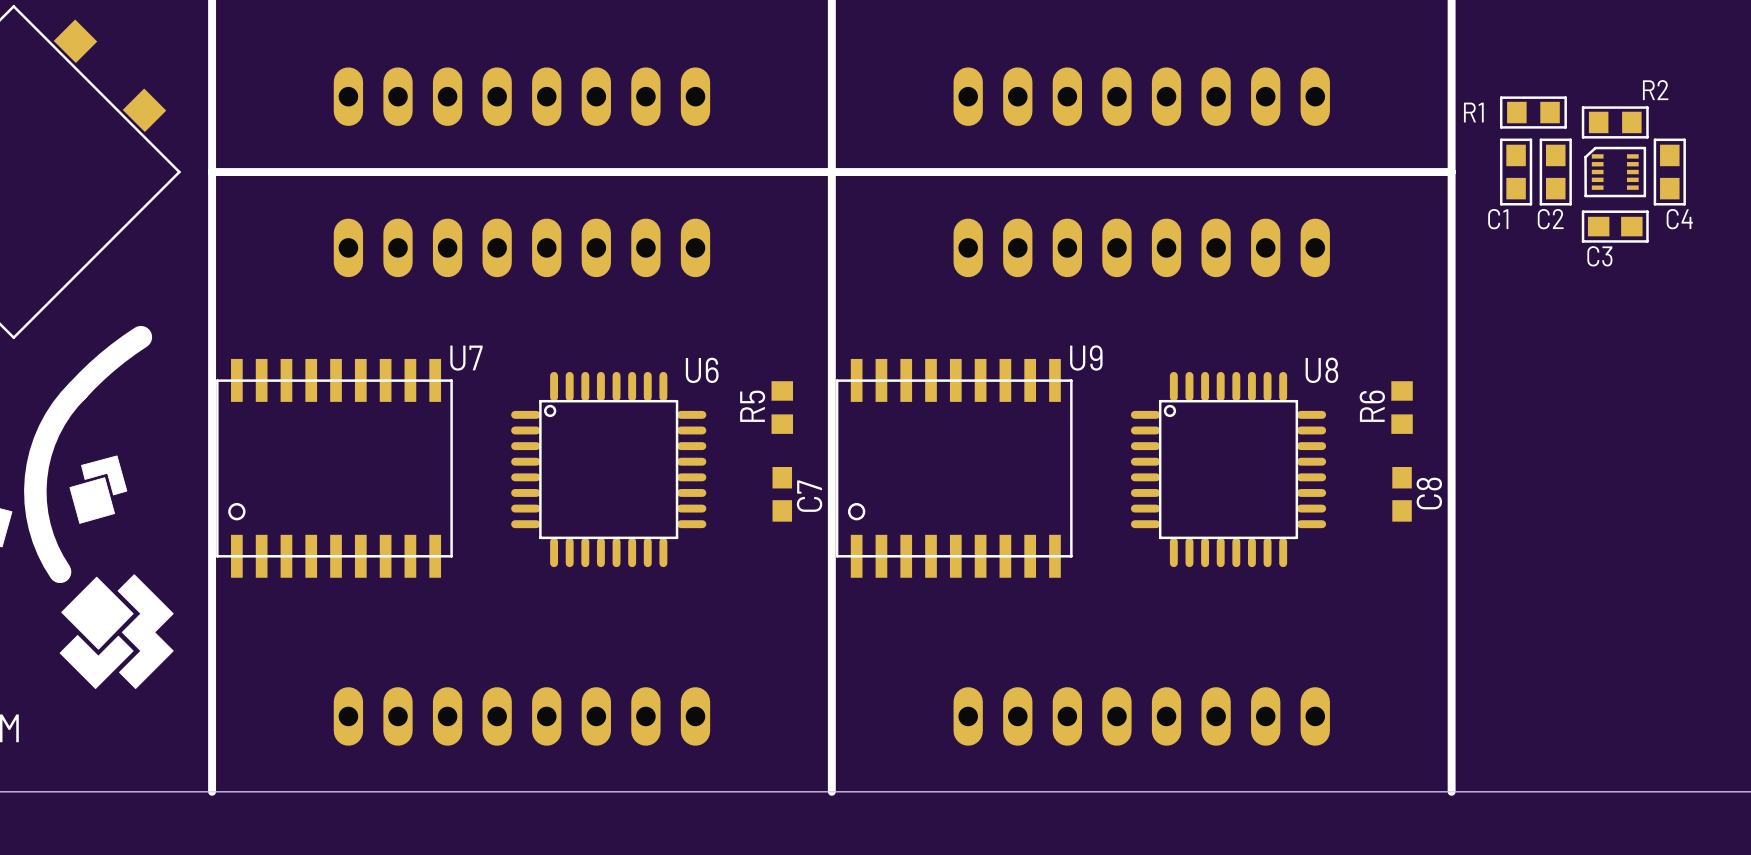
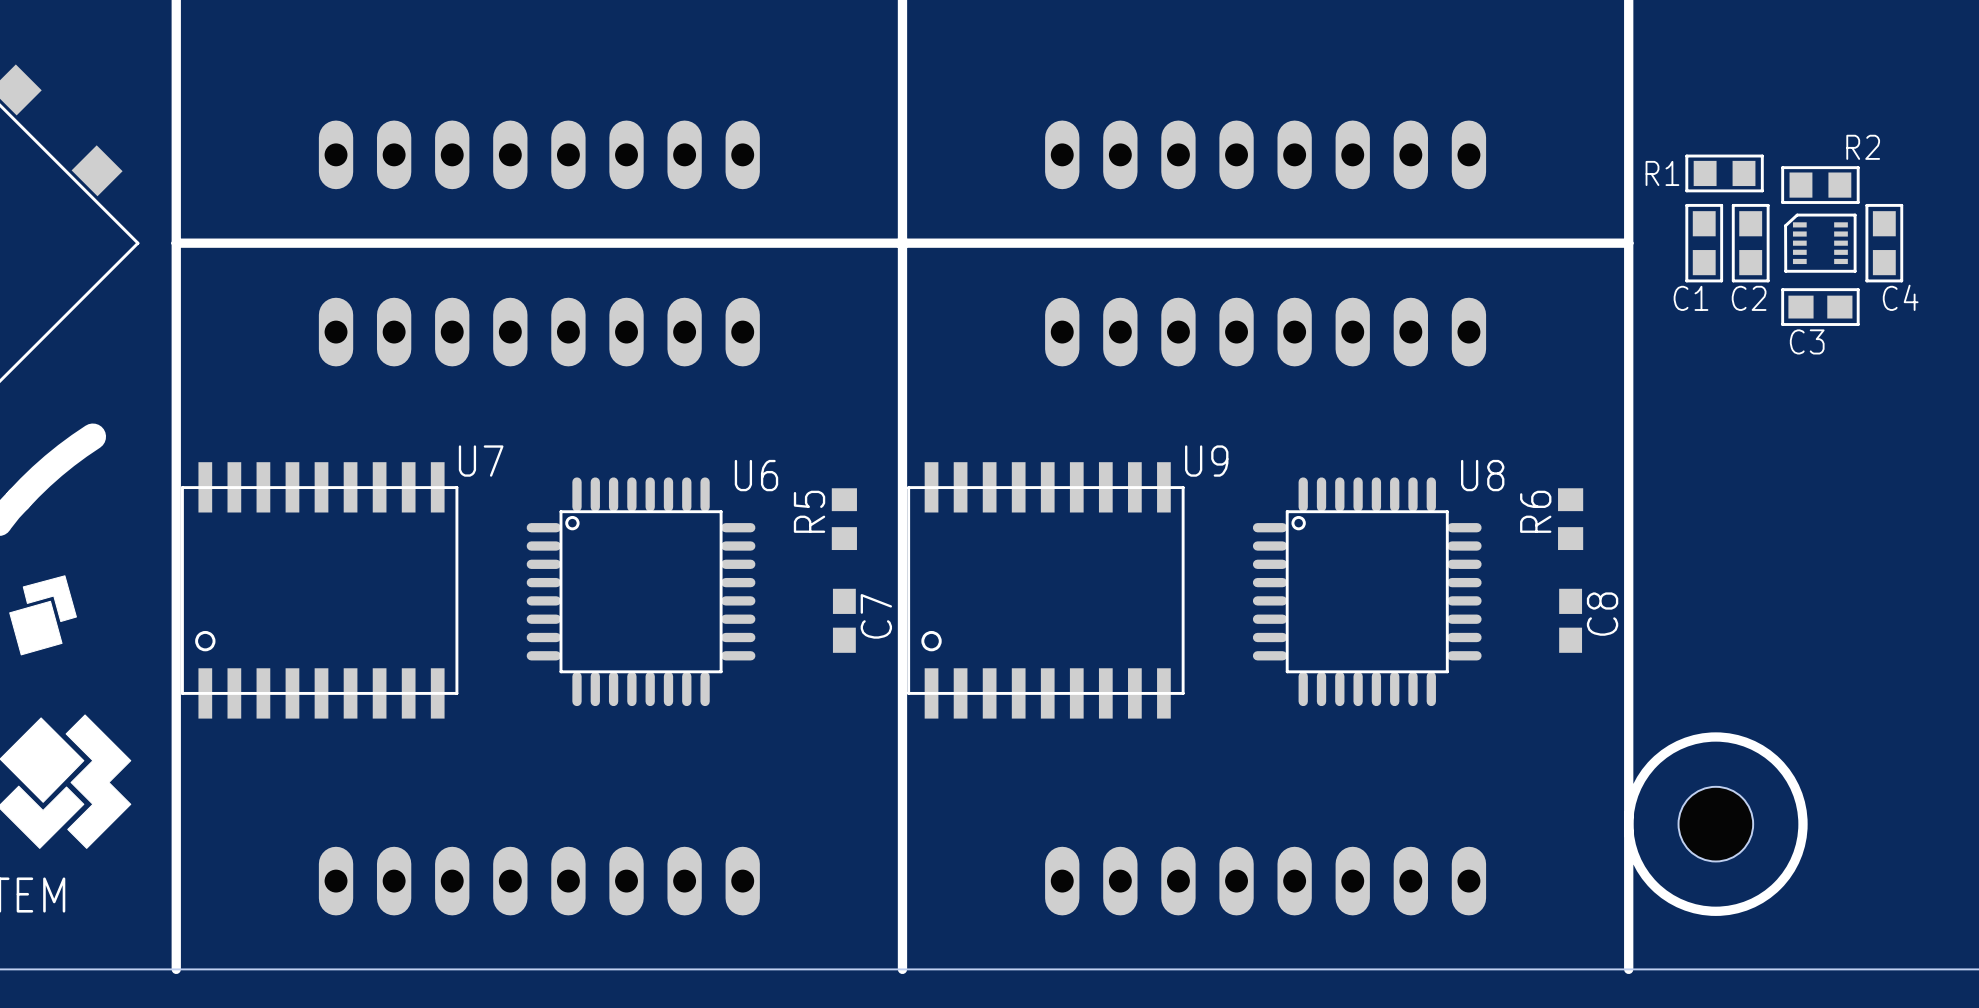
drawing: none -> [1624, 732, 1808, 916]
hole: none -> (1715, 824)

